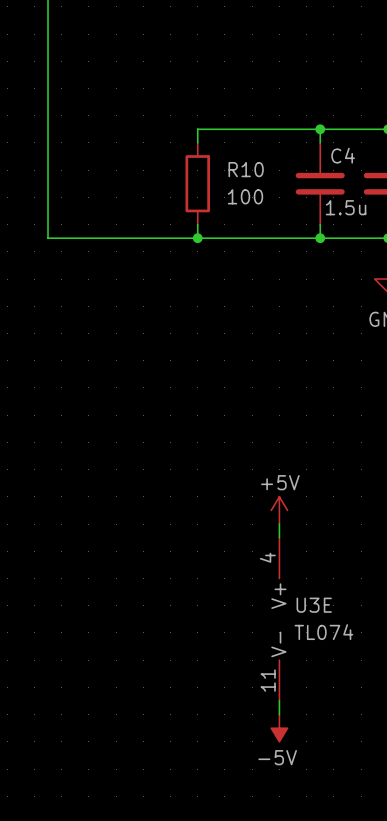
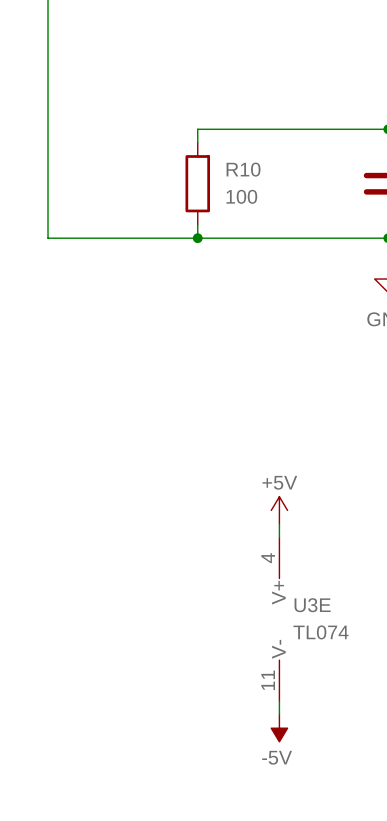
wire: (320, 129) (320, 142) -> none
junction: (320, 129) -> none
C4: 1.5u (320, 183) -> none
wire: (320, 224) (320, 238) -> none
junction: (320, 238) -> none

